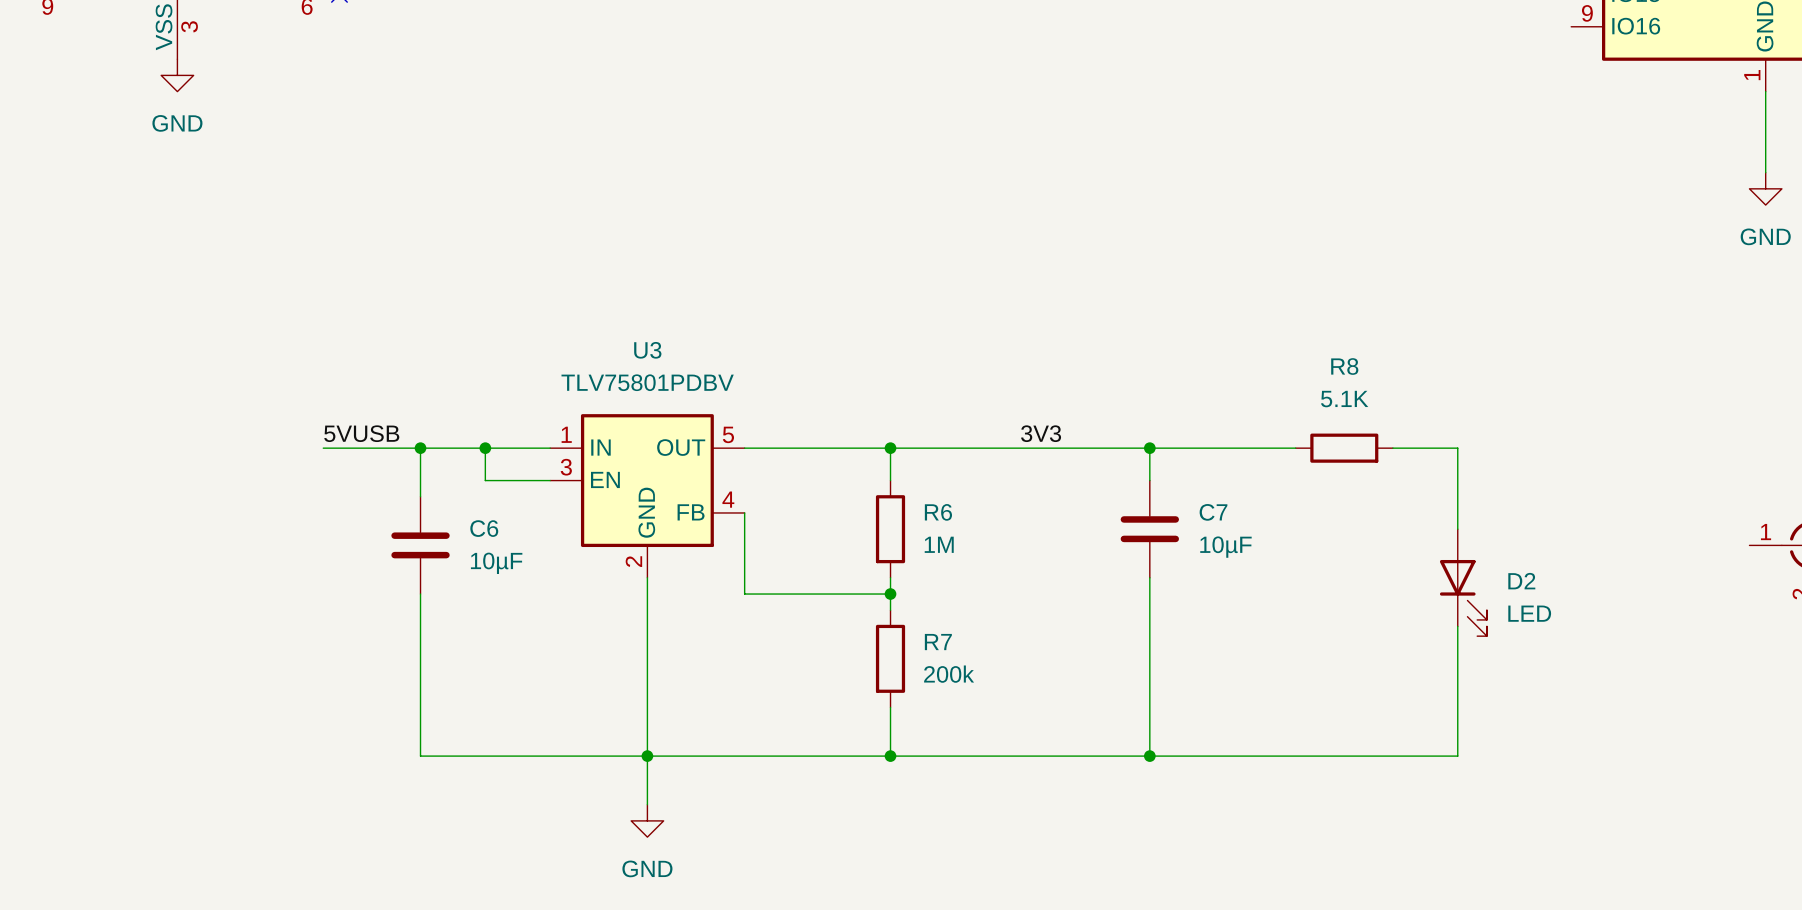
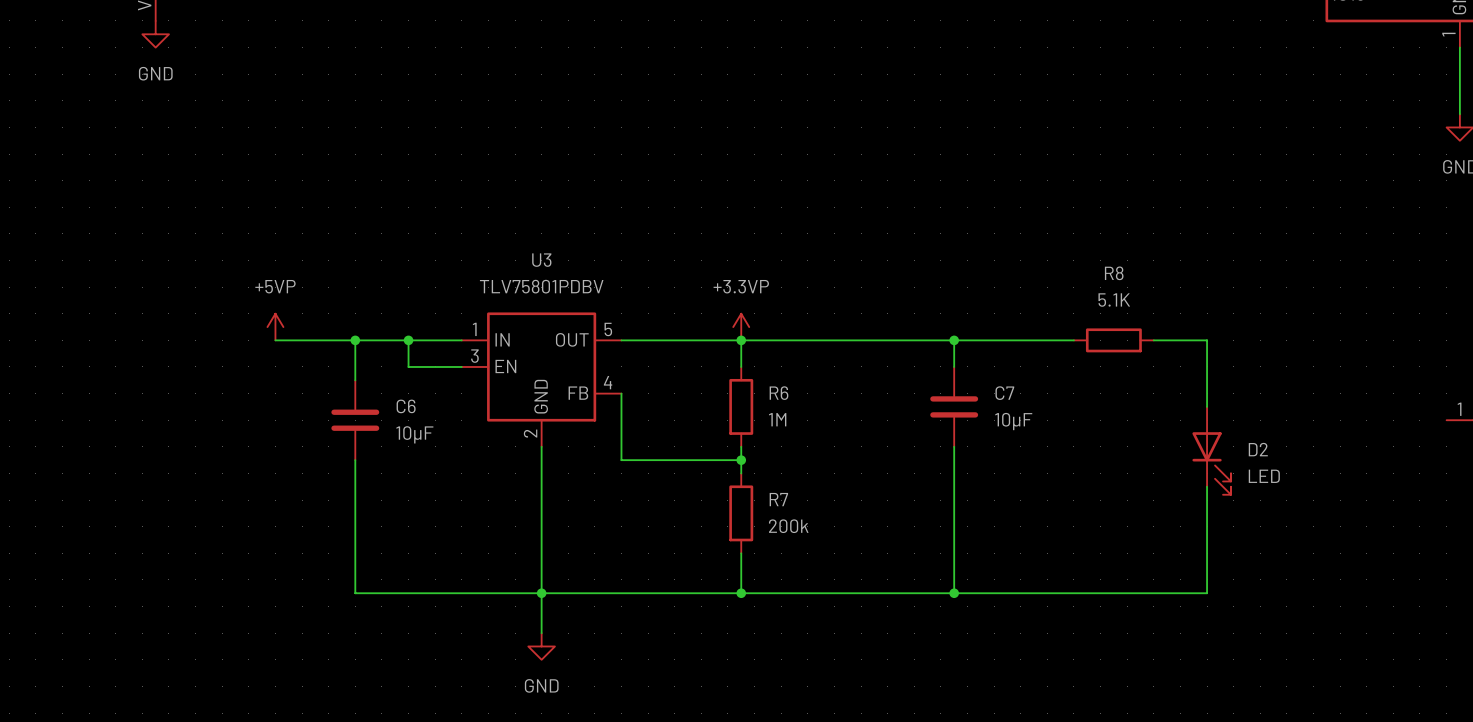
power symbol: none -> +5VP (275, 327)
power symbol: none -> +3.3VP (741, 327)
label: 5VUSB (361, 433) -> none
label: 3V3 (1041, 433) -> none

